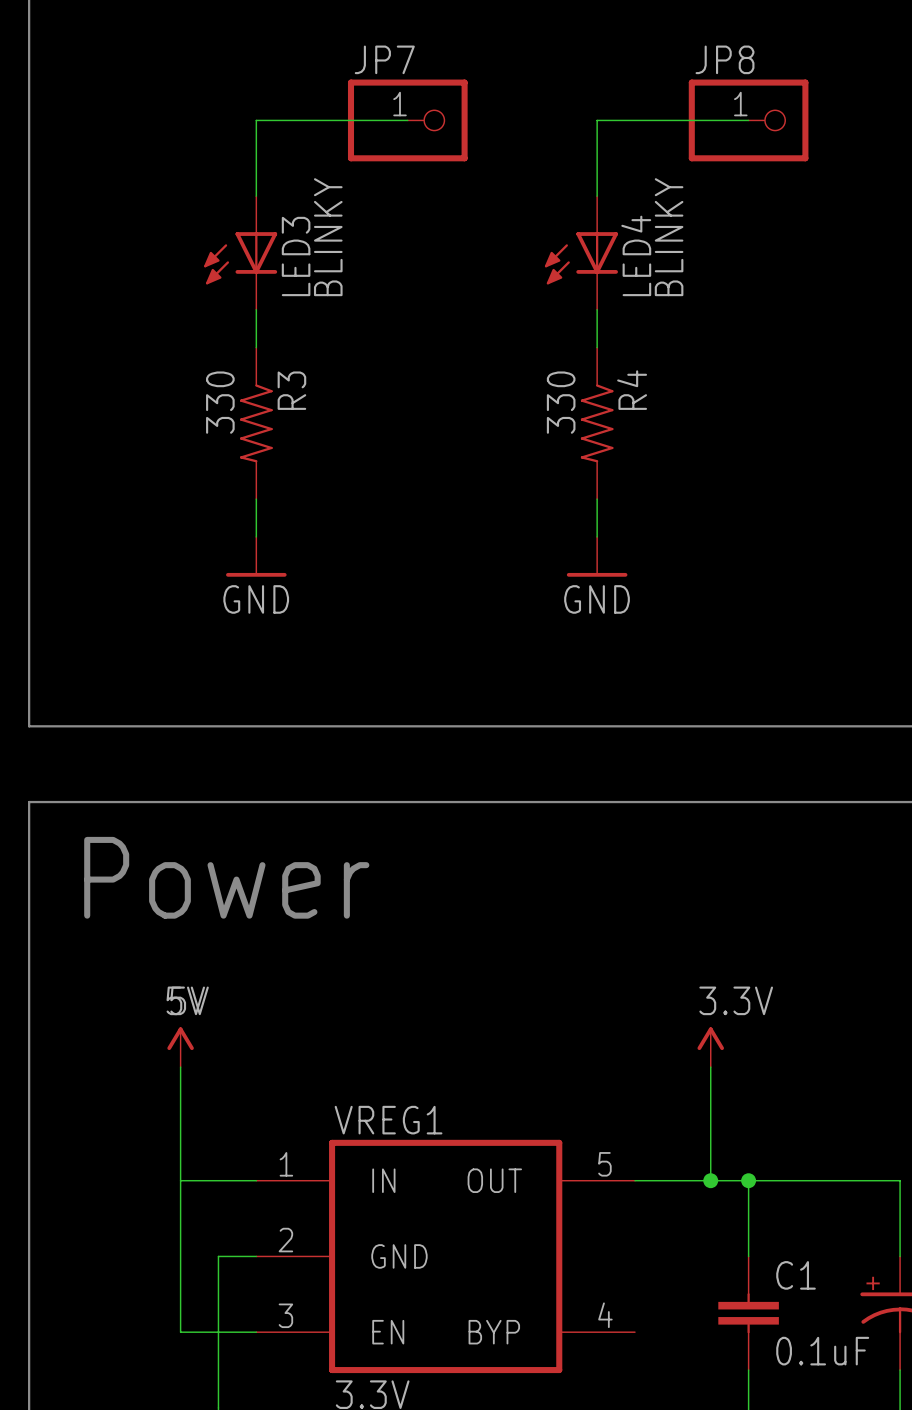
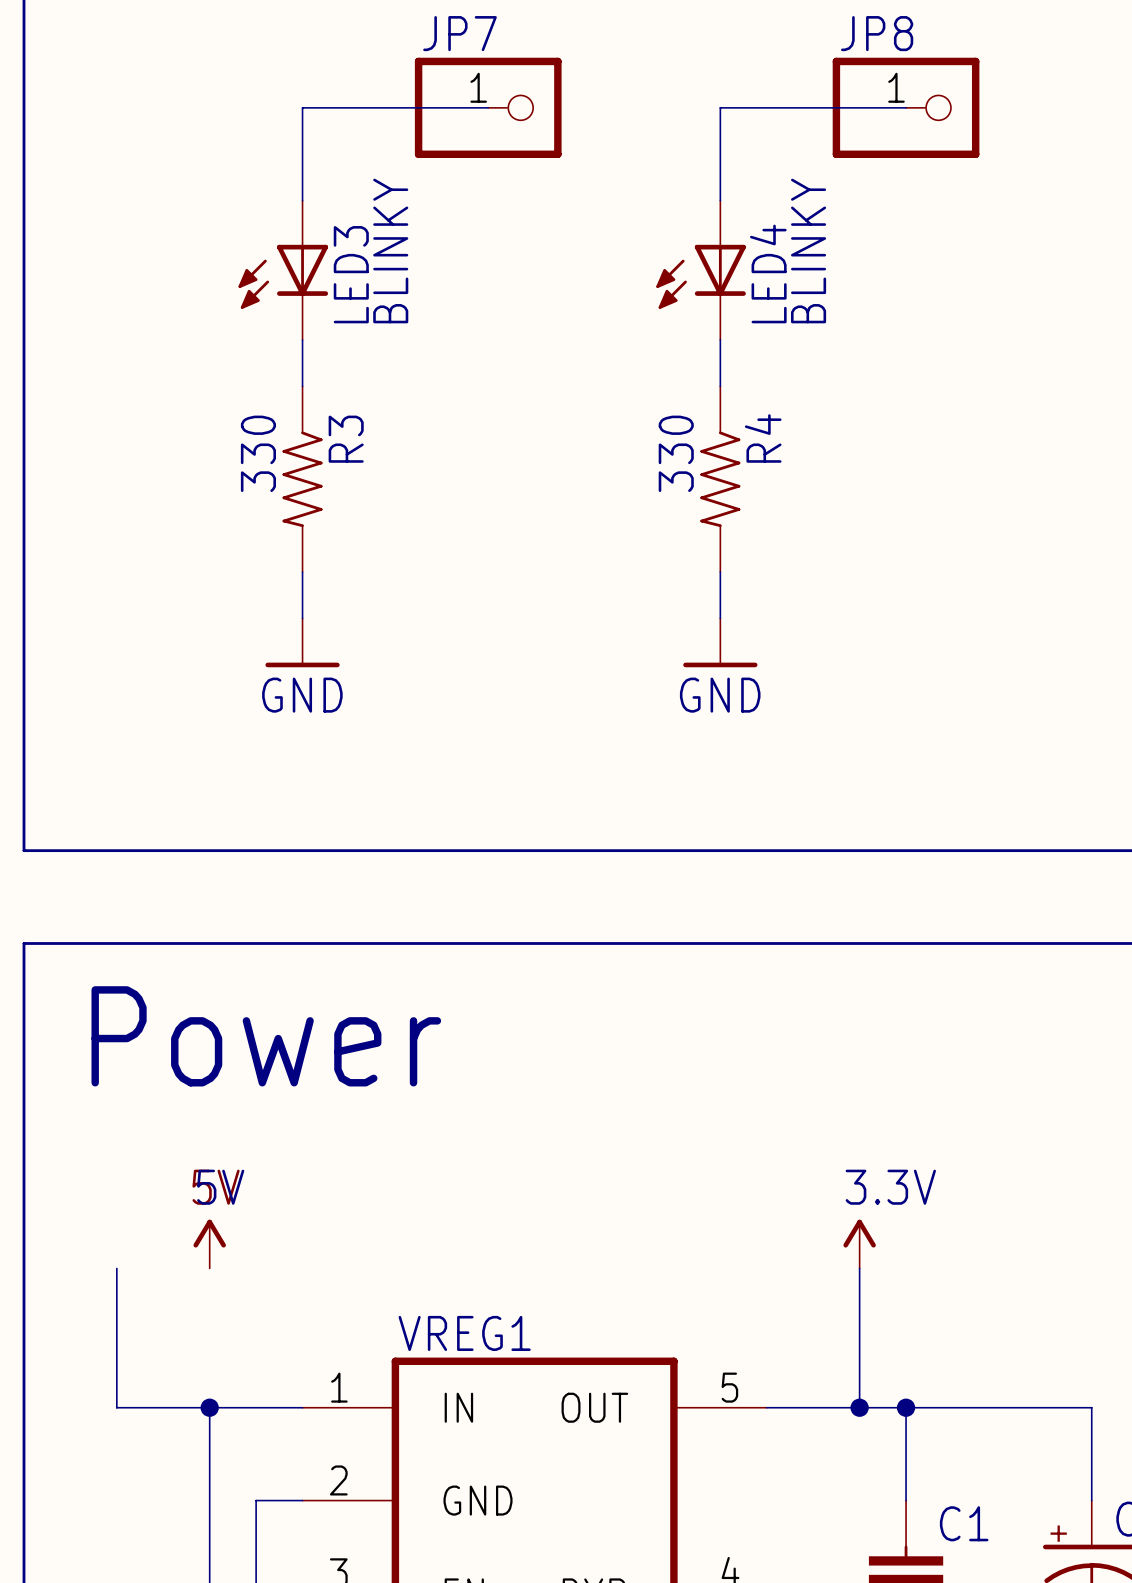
wire: (180, 1067) (180, 1180) -> (116, 1268) (116, 1407) (209, 1407)
junction: none -> (209, 1407)

